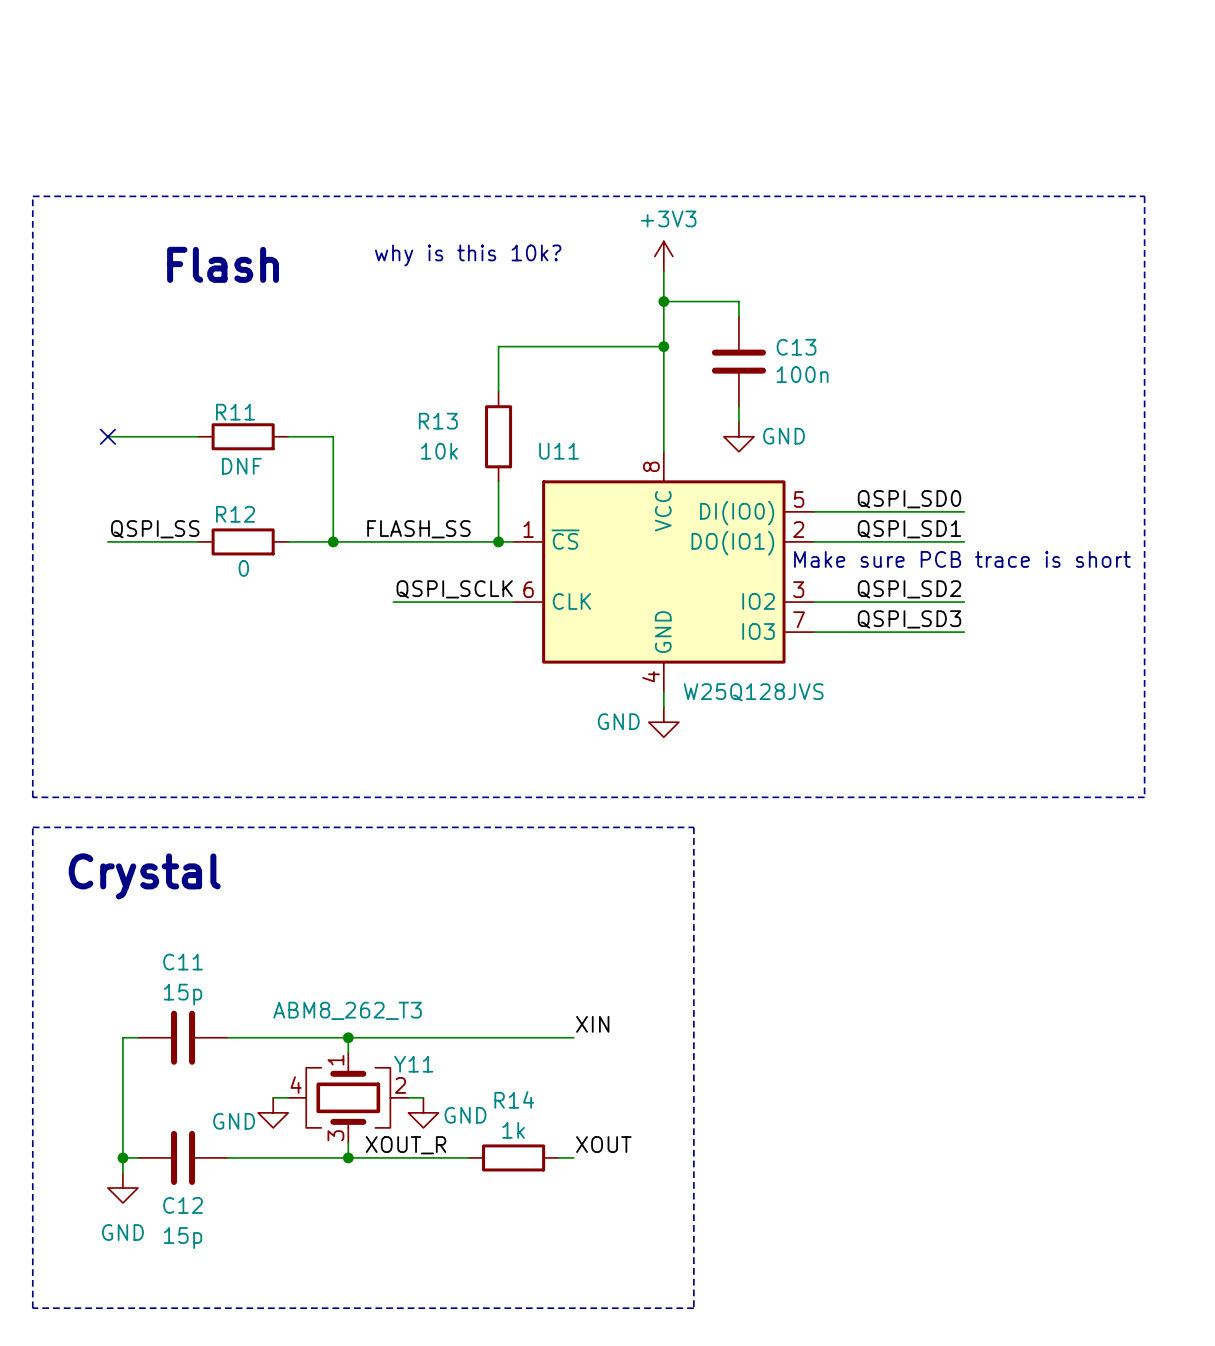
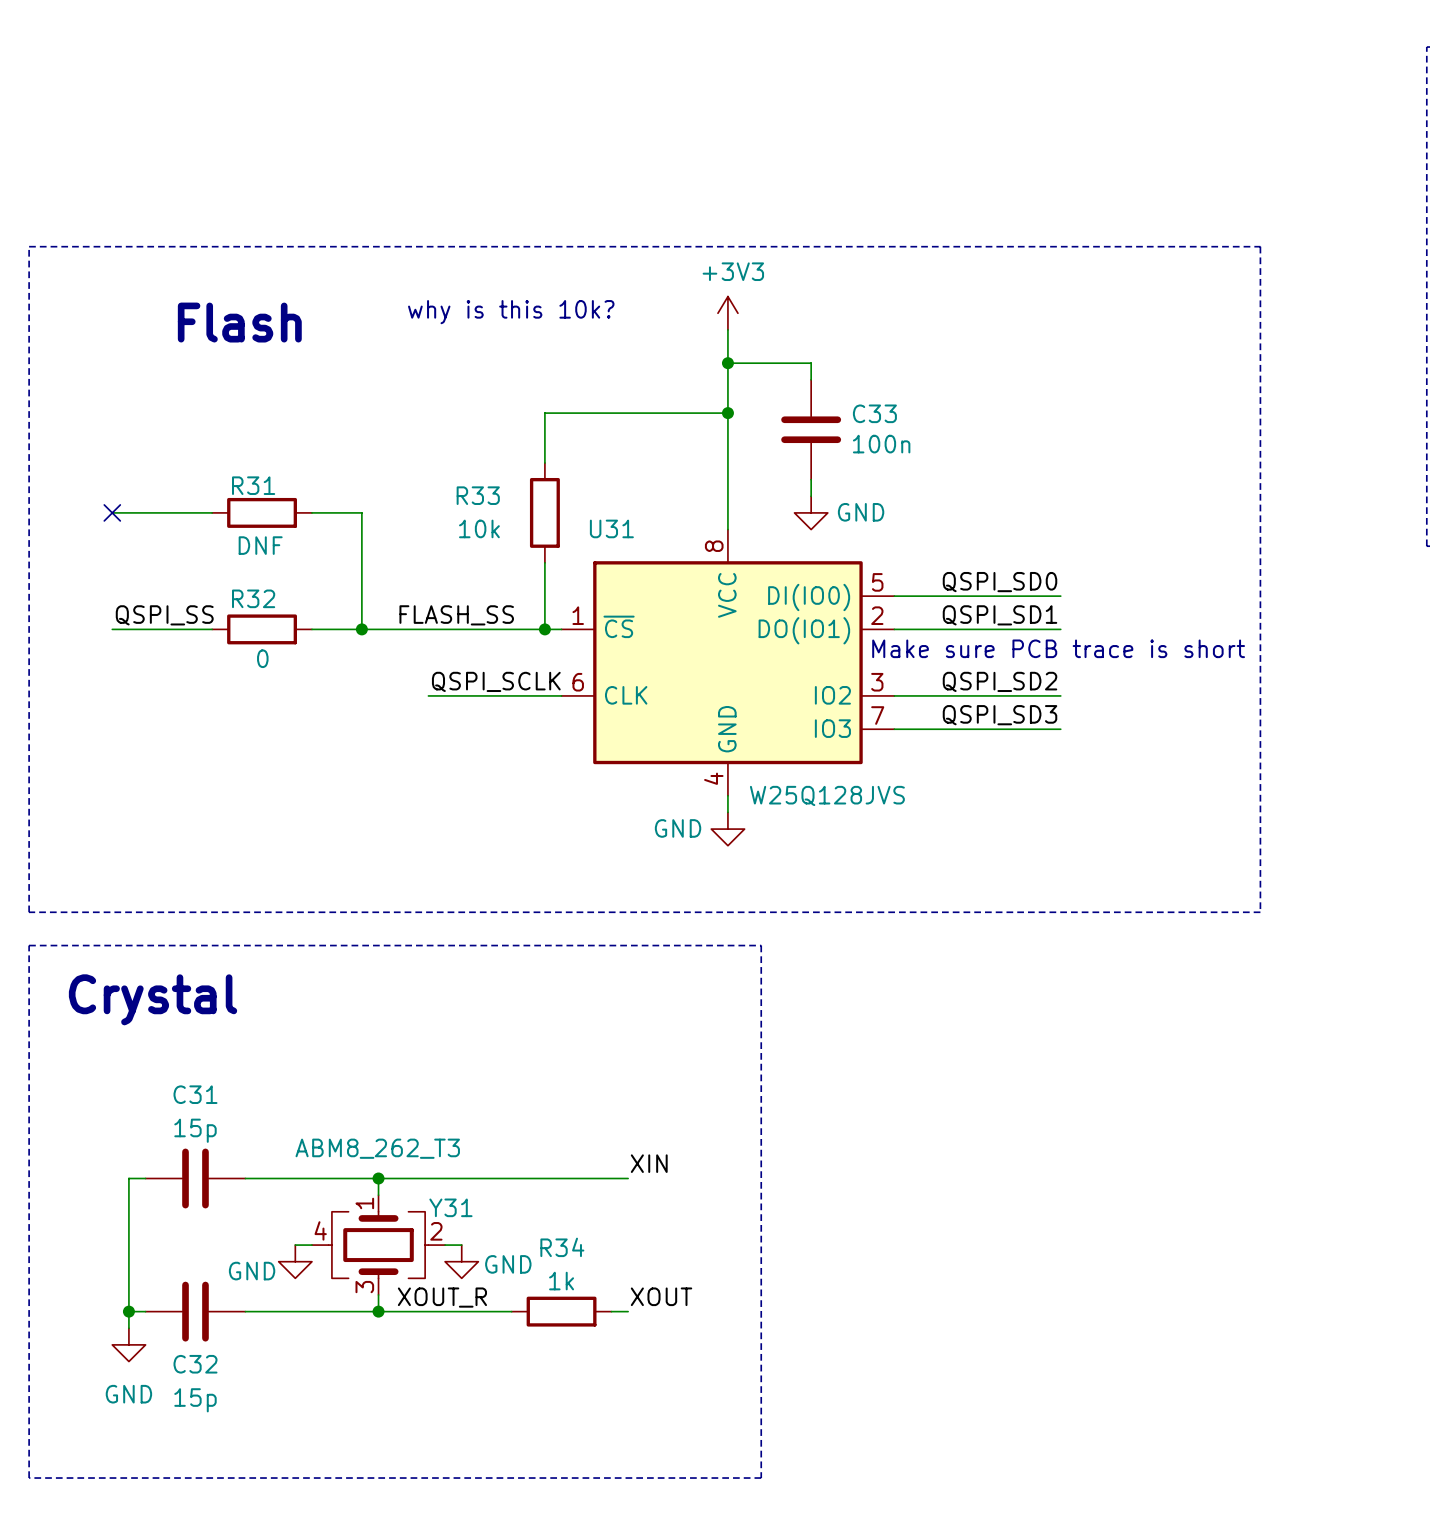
C13 name: C13 (796, 347) -> C33 (874, 413)
R11 name: R11 (235, 412) -> R31 (253, 485)
R13 name: R13 (438, 421) -> R33 (478, 495)
U11 name: U11 (559, 451) -> U31 (611, 528)
R12 name: R12 (235, 514) -> R32 (253, 598)
C11 name: C11 (183, 962) -> C31 (195, 1094)
Y11 name: Y11 (413, 1064) -> Y31 (450, 1207)
R14 name: R14 (514, 1099) -> R34 (562, 1247)
C12 name: C12 (183, 1205) -> C32 (195, 1364)

